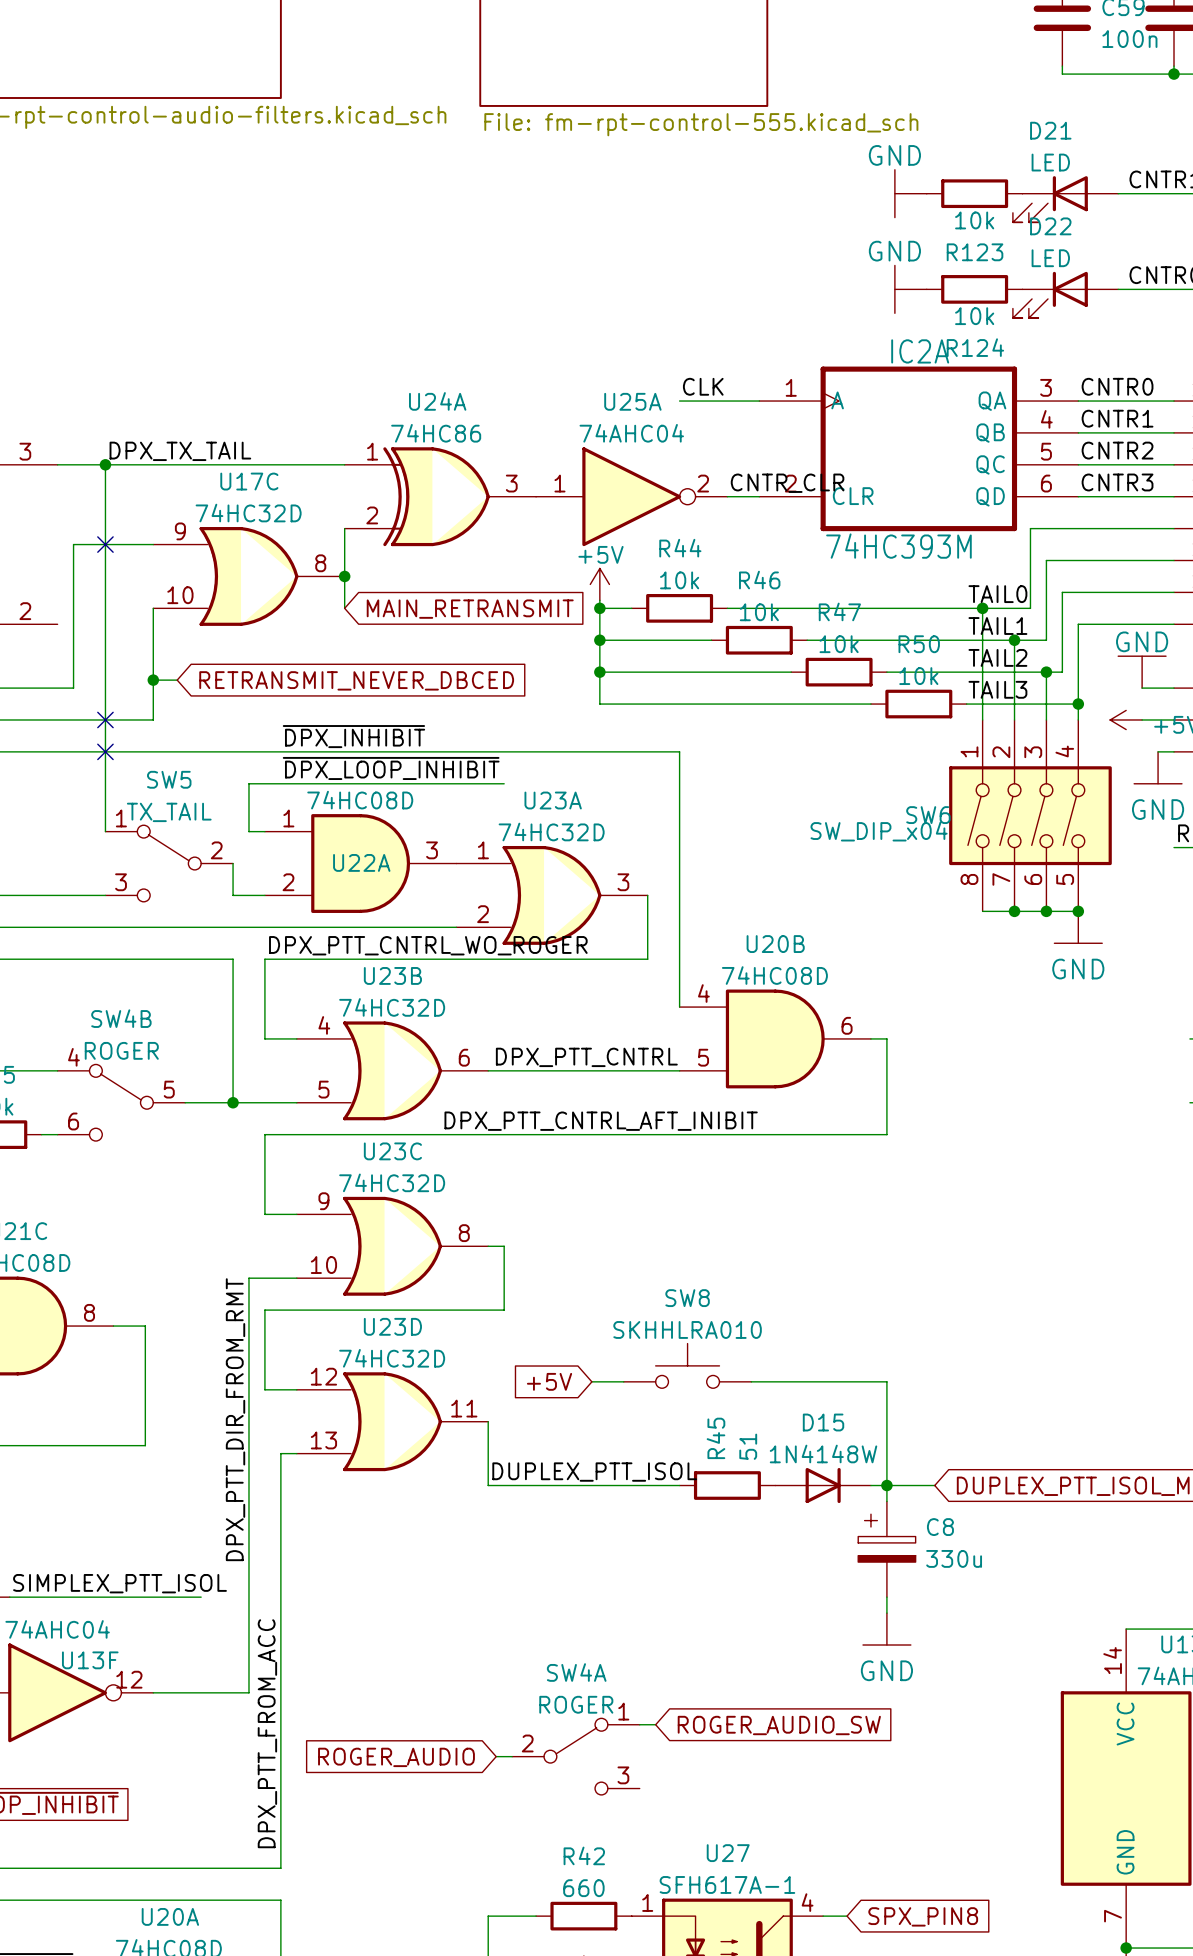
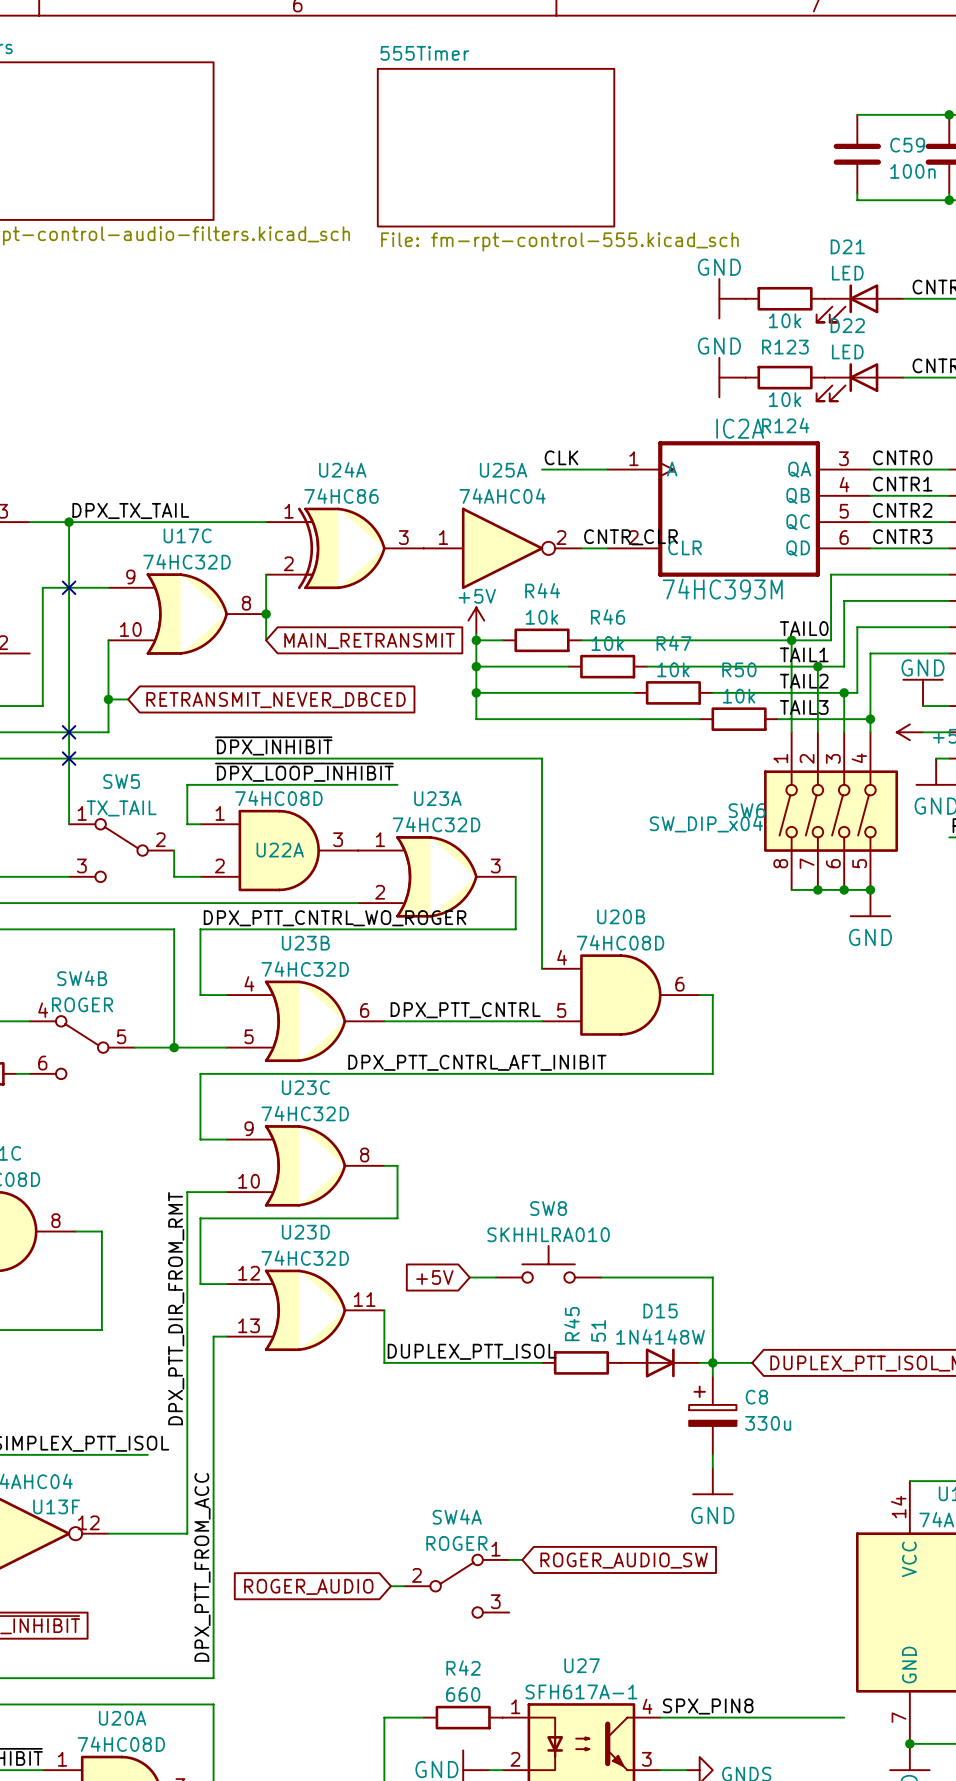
label: none -> SPX_PIN8 (708, 1706)
wire: none -> (679, 1717) (844, 1717)
global label: SPX_PIN8 (923, 1916) -> none

